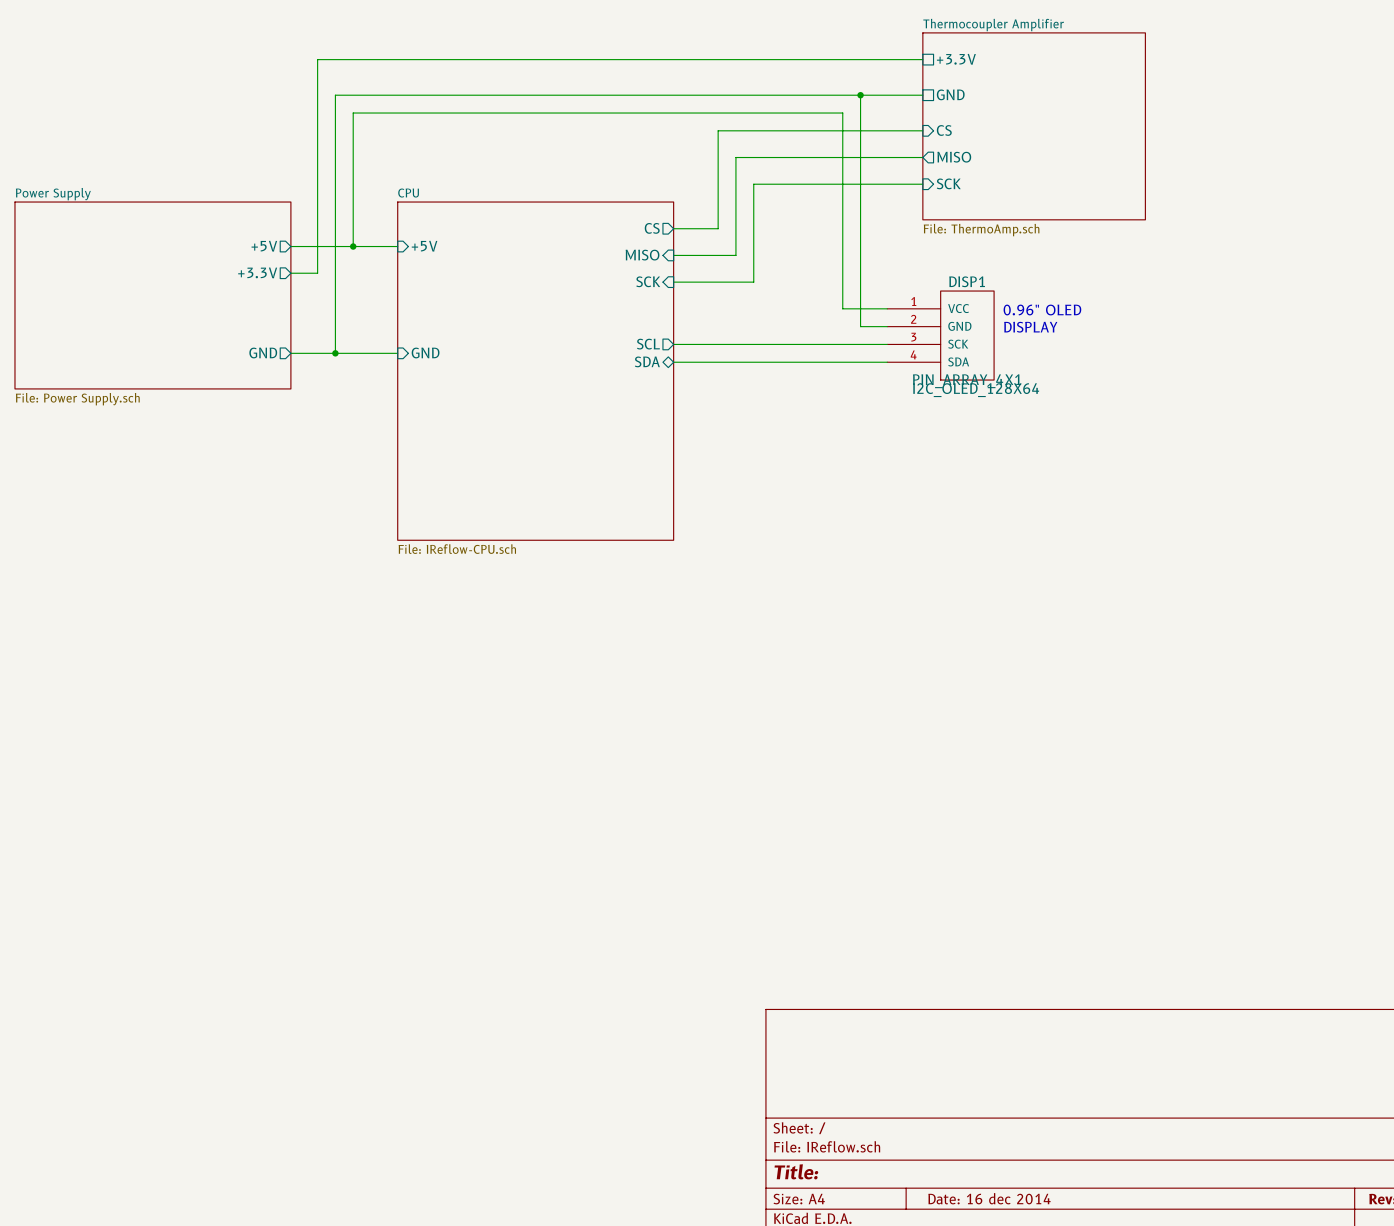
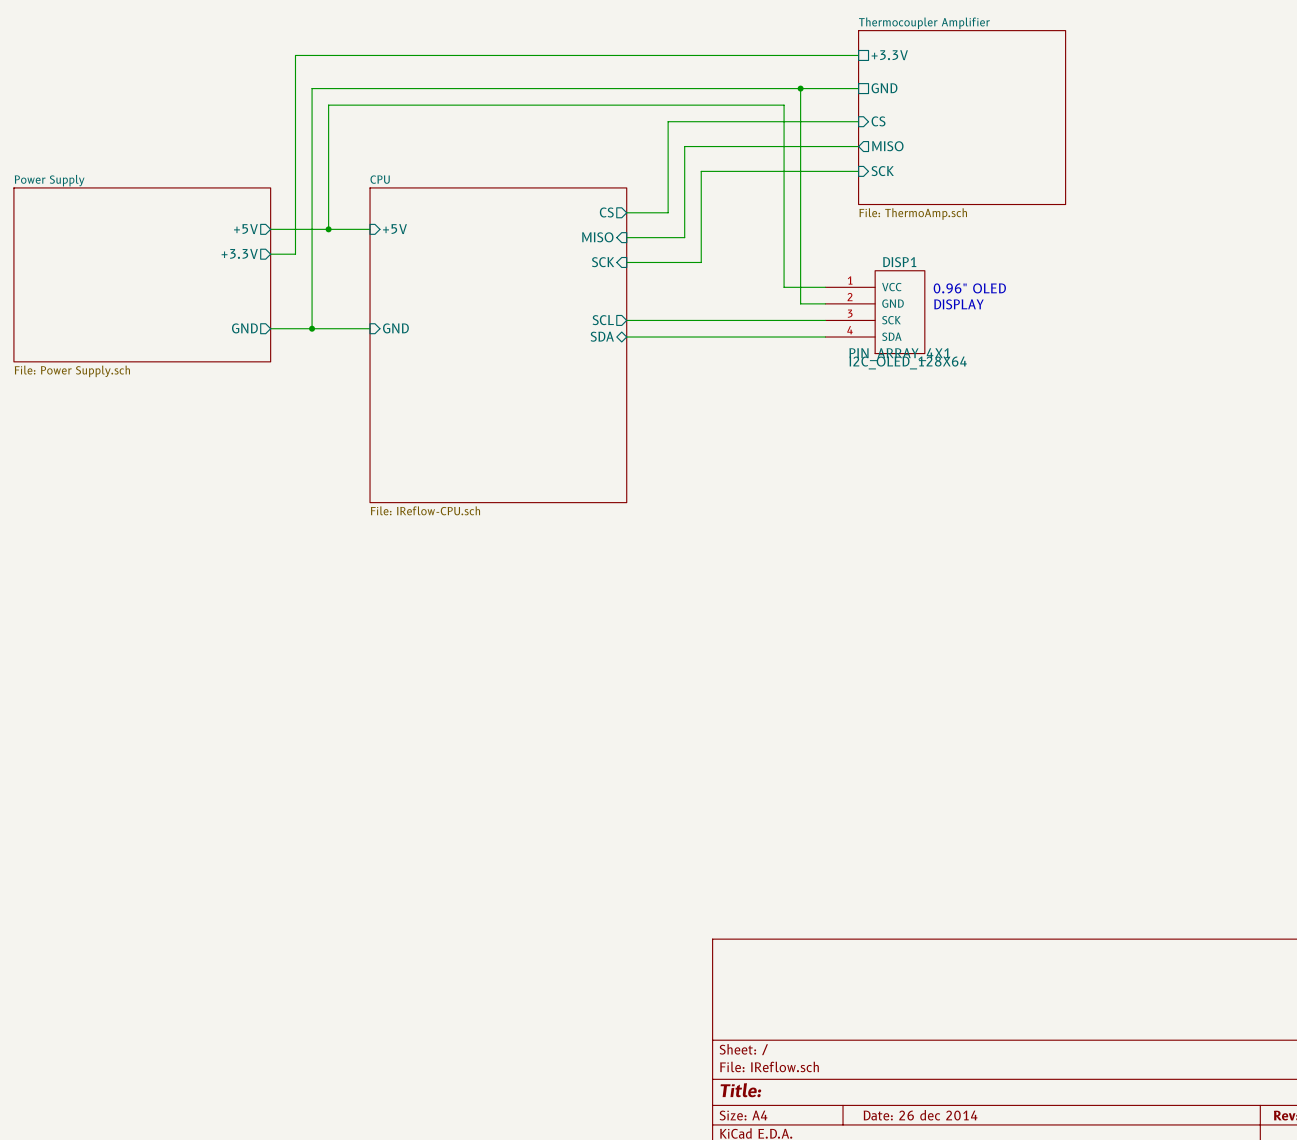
title block: Date: 16 dec 2014 (989, 1198) -> Date: 26 dec 2014 (920, 1115)

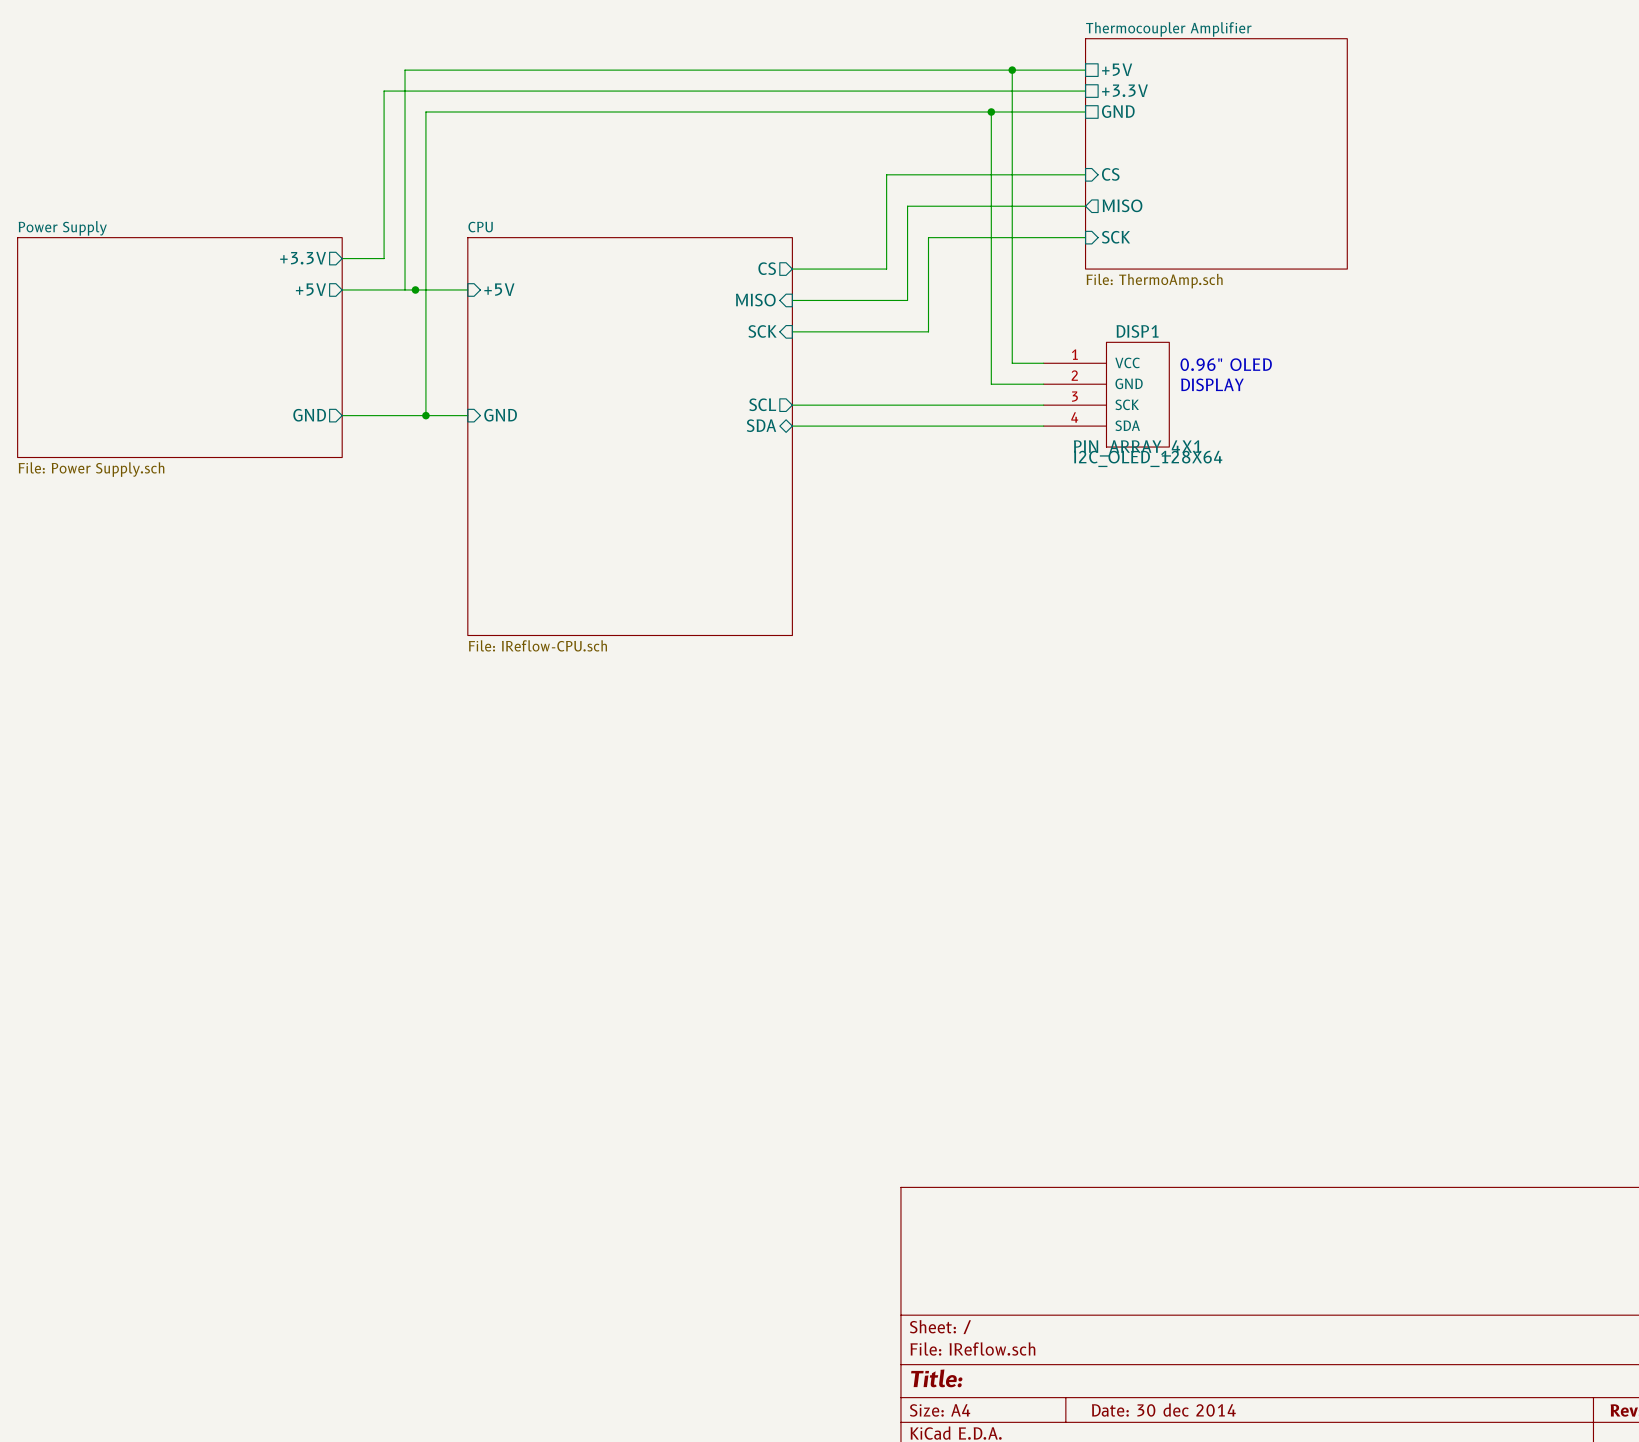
sheet Thermocoupler Amplifier shape: [858, 30, 1066, 205] -> [1085, 38, 1348, 270]
wire: (320, 55) (295, 55) (295, 254) (270, 254) -> (405, 70) (405, 289)
wire: none -> (1012, 70) (1012, 112)
junction: none -> (1012, 70)
sheet pin: +3.3V (889, 55) -> +5V (1117, 69)
sheet pin: none -> +3.3V (1124, 90)
wire: none -> (1085, 91) (384, 91) (384, 258) (342, 258)
wire: (336, 88) (312, 88) (312, 328) -> (425, 112) (425, 415)
junction: none -> (991, 112)
junction: (800, 88) -> none
wire: (784, 105) (328, 105) (328, 229) -> (991, 132) (991, 112)
wire: (858, 121) (668, 121) (668, 212) -> none
sheet pin position: CS (878, 121) -> CS (1110, 174)
wire: (858, 146) (684, 146) (684, 237) -> (1085, 206) (907, 206) (907, 300) (865, 300)
sheet pin position: MISO (887, 146) -> MISO (1122, 205)
wire: (701, 171) (858, 171) -> (886, 216) (886, 174) (1085, 174)
sheet pin position: SCK (882, 171) -> SCK (1116, 237)
wire: none -> (1085, 237) (928, 237) (928, 331) (886, 331)
wire: (701, 212) (701, 262) -> (886, 269) (844, 269)
sheet pin position: +3.3V (239, 253) -> +3.3V (303, 258)
wire: (784, 287) (800, 287) (800, 303) -> (991, 363) (991, 384) (1012, 384)
junction position: (312, 328) -> (425, 415)
title block: Date: 26 dec 2014 (920, 1115) -> Date: 30 dec 2014 (1163, 1410)

